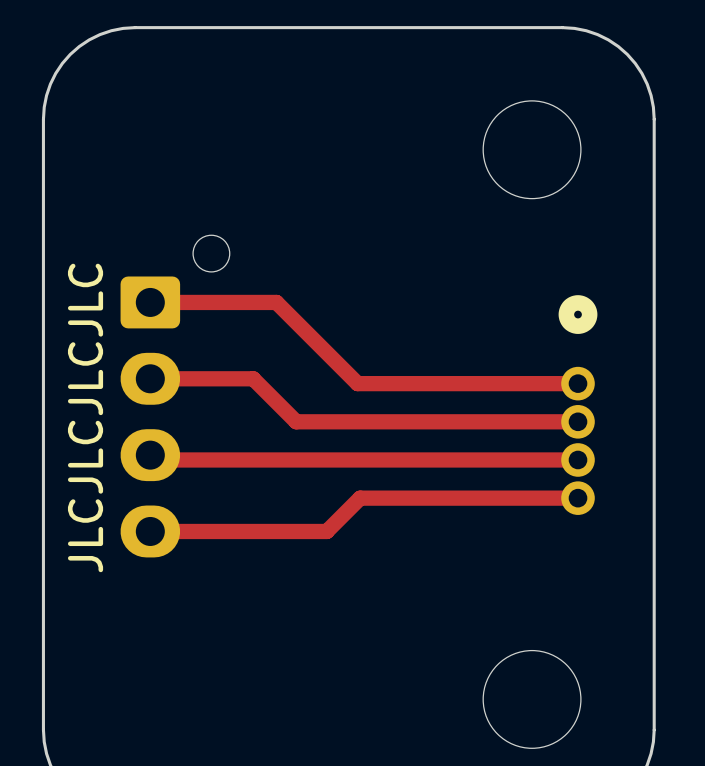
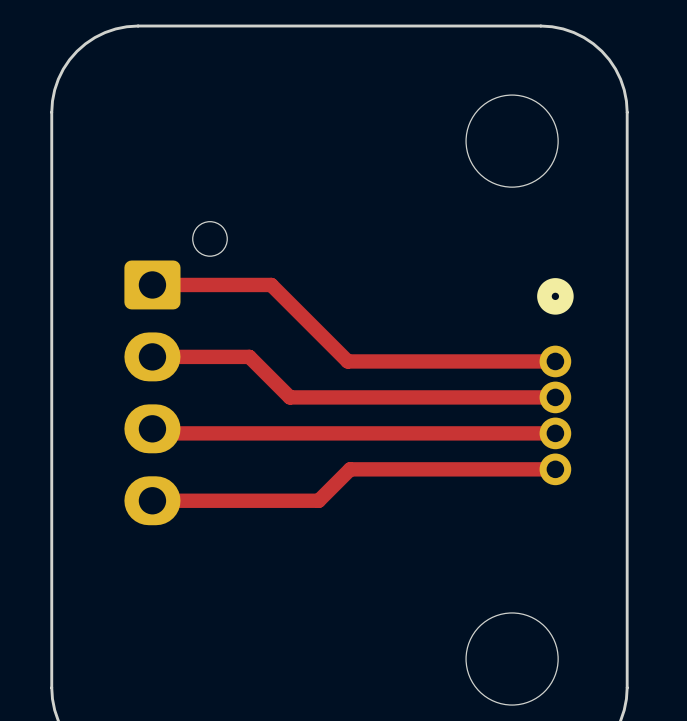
text: JLCJLCJLCJLC (85, 417) -> none

